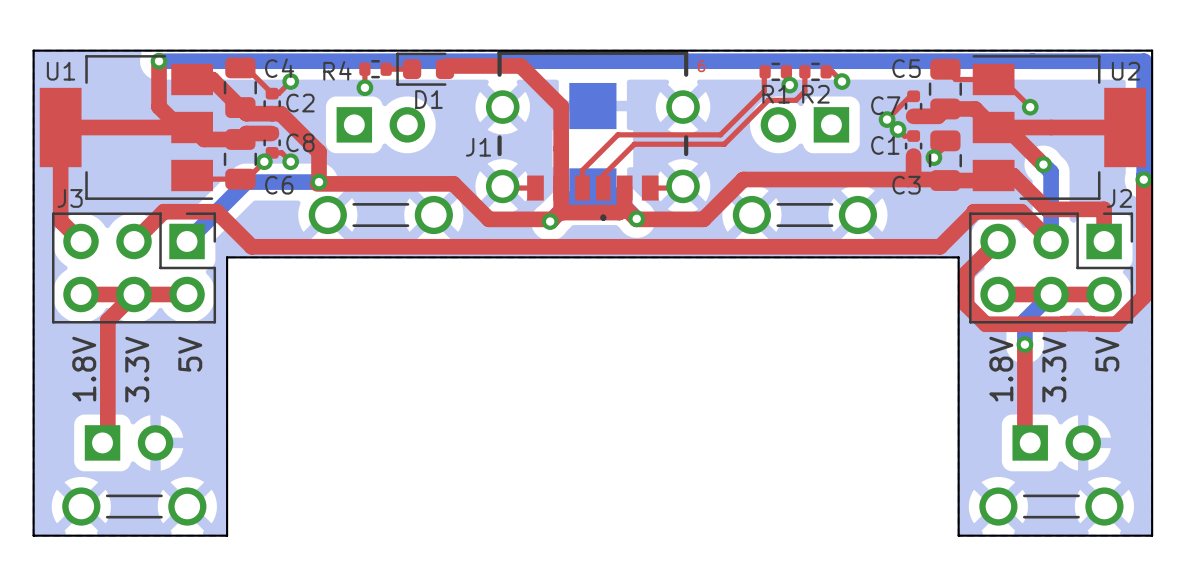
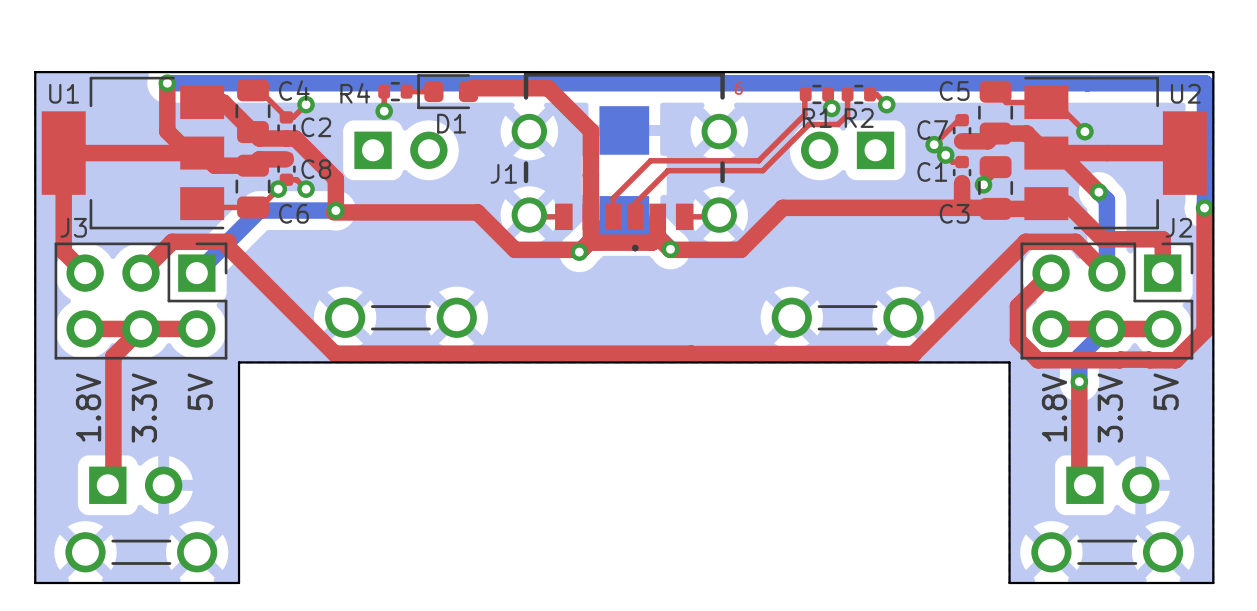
top track: (216, 211) (251, 246) (940, 246) (974, 211) -> (228, 241) (228, 247) (334, 353) (691, 354) (913, 354) (1025, 241)
part position: (380, 215) -> (400, 317)
part position: (804, 215) -> (847, 317)
board edge: (227, 326) (227, 257) (958, 257) (958, 326) -> (239, 362) (1009, 362)

